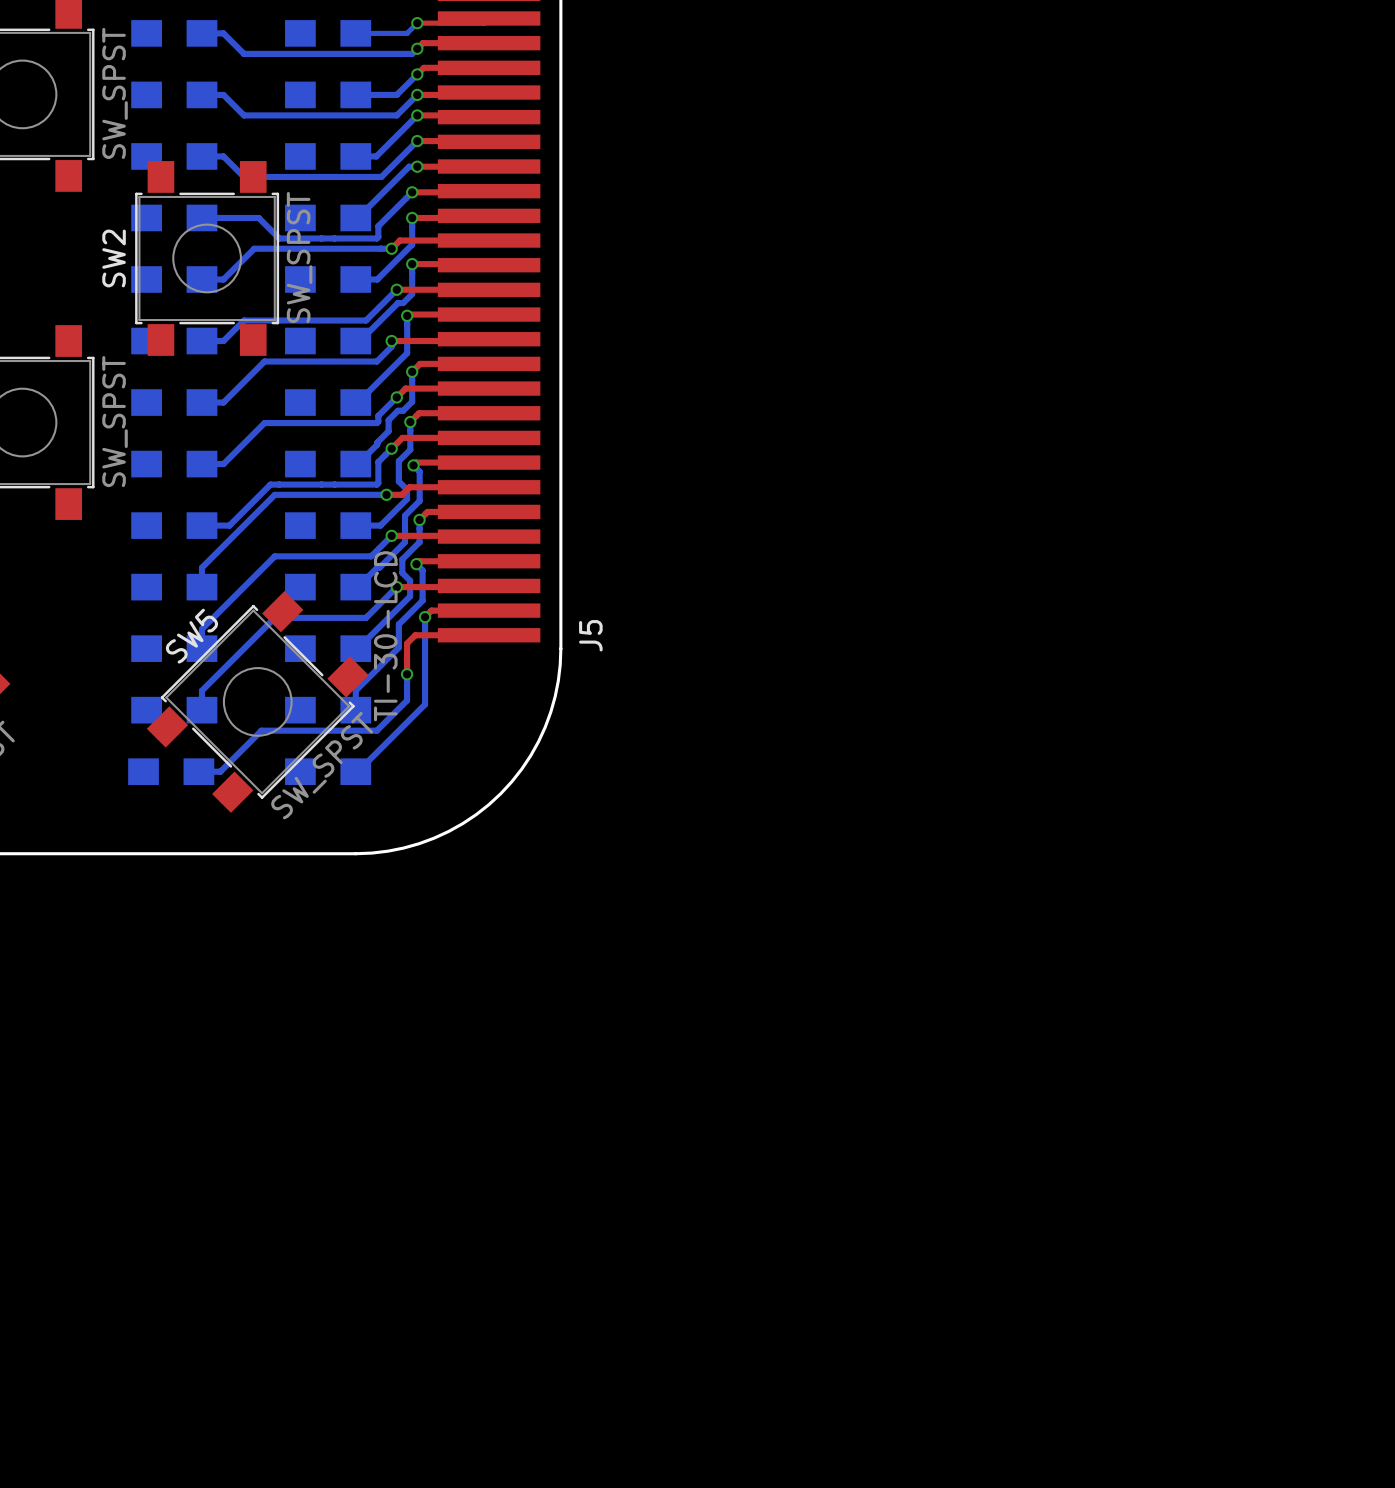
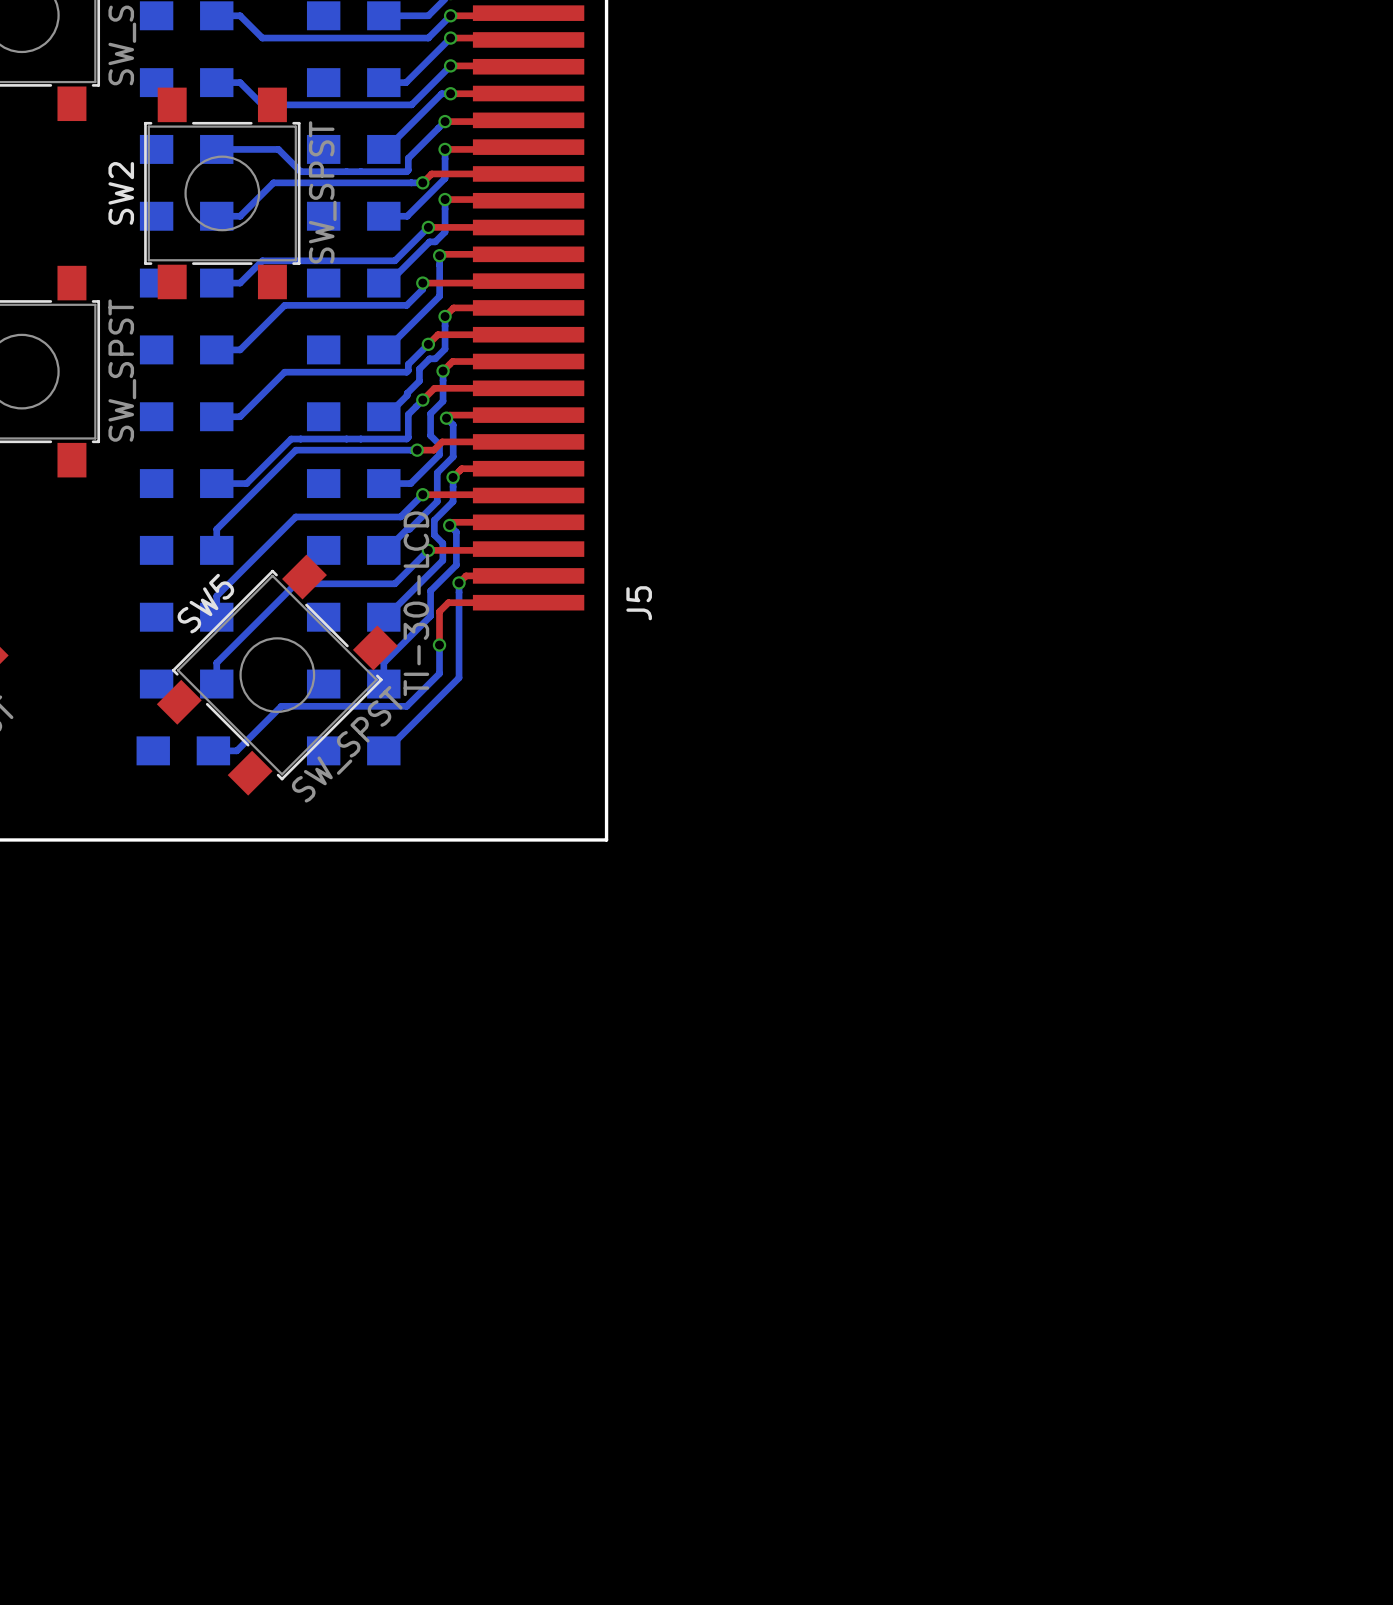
board edge: (560, 648) (558, 680) (545, 727) (530, 755) (500, 793) (462, 823) (434, 838) (387, 851) (355, 853) -> (606, 617) (606, 839) (383, 839)

